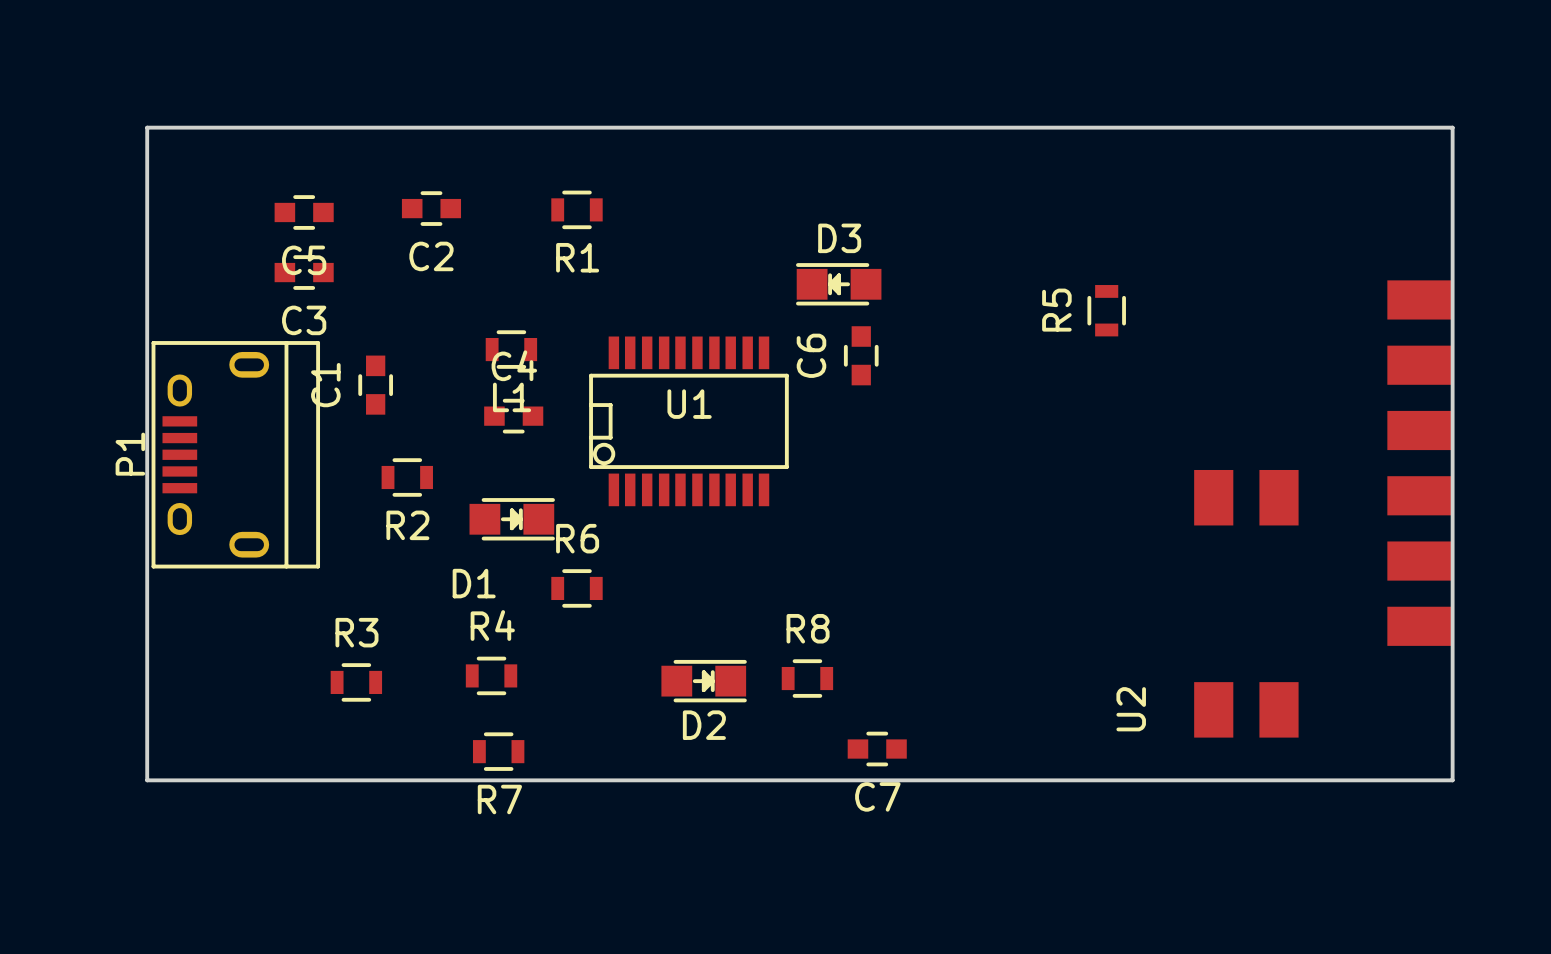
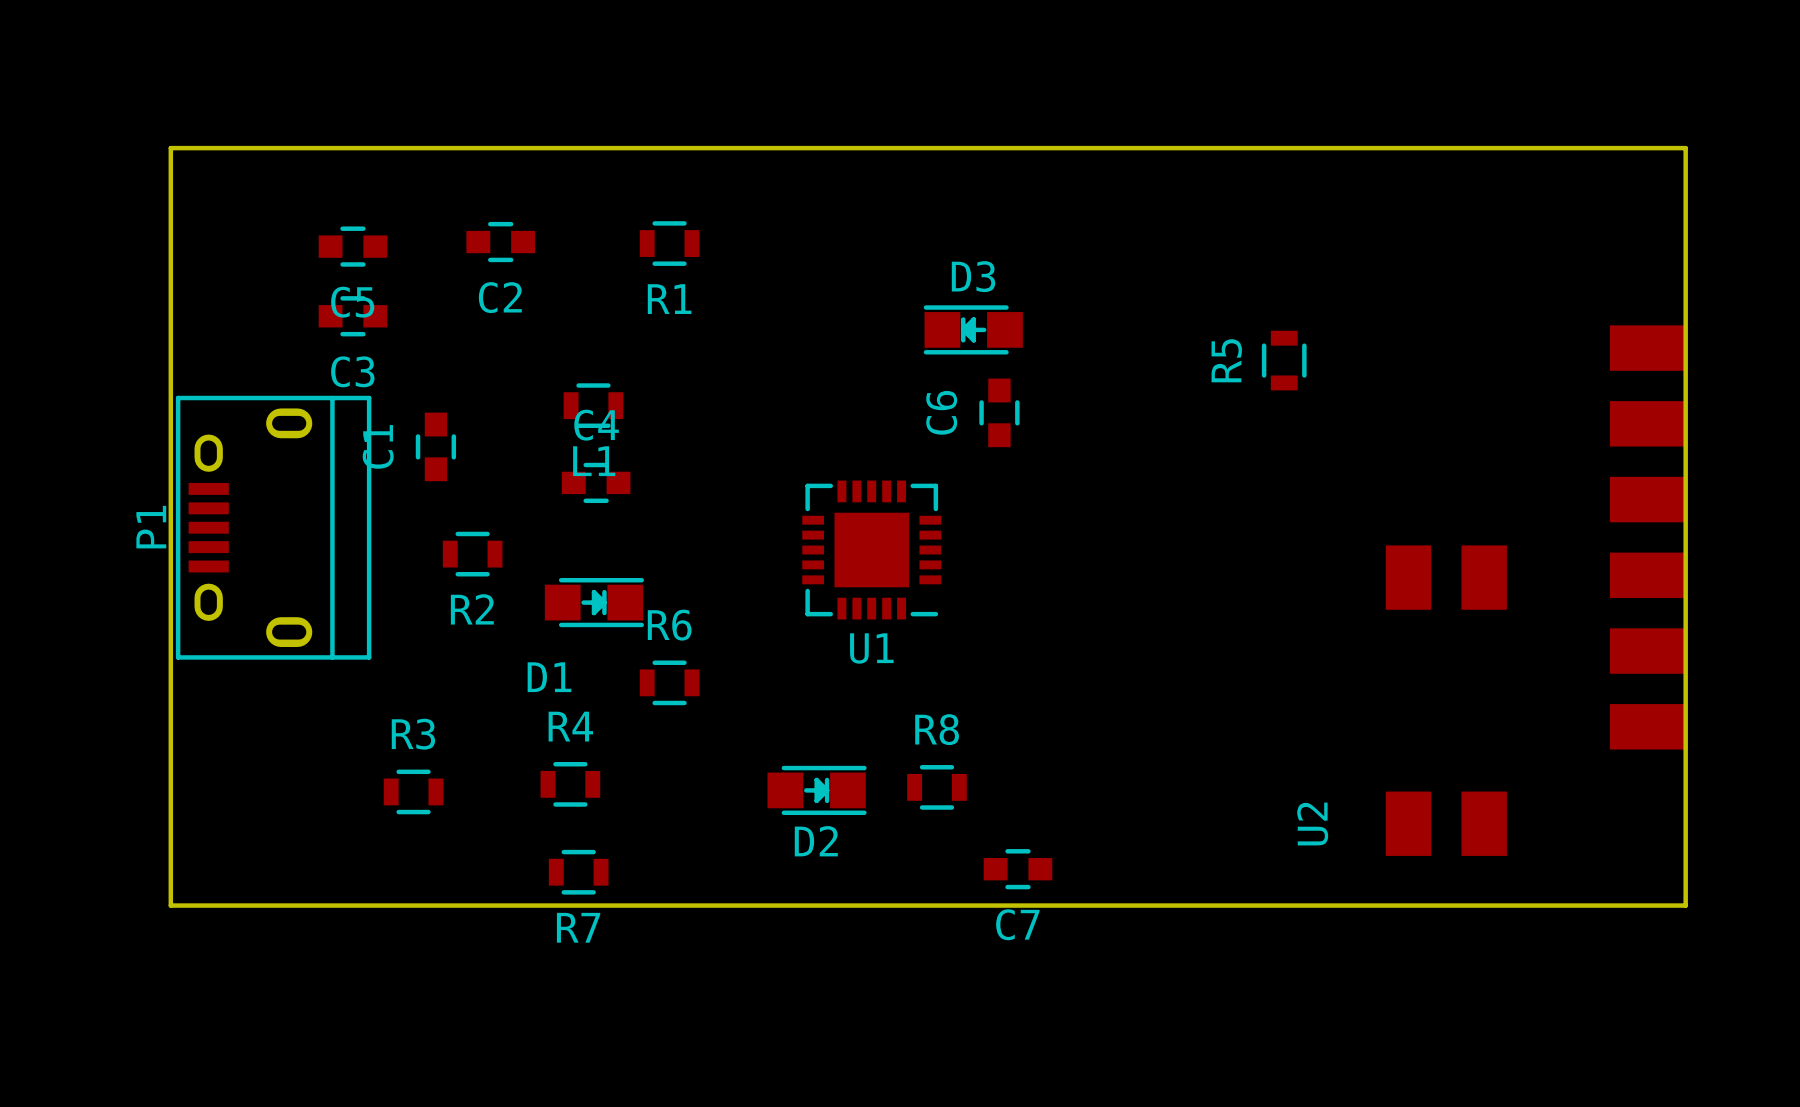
U1 footprint: [589, 336, 789, 507] -> [802, 480, 942, 620]
U1 name position: U1 (689, 404) -> U1 (871, 648)

